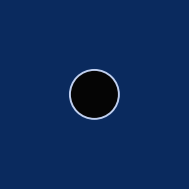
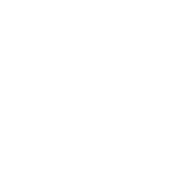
part: (94, 94) -> none

